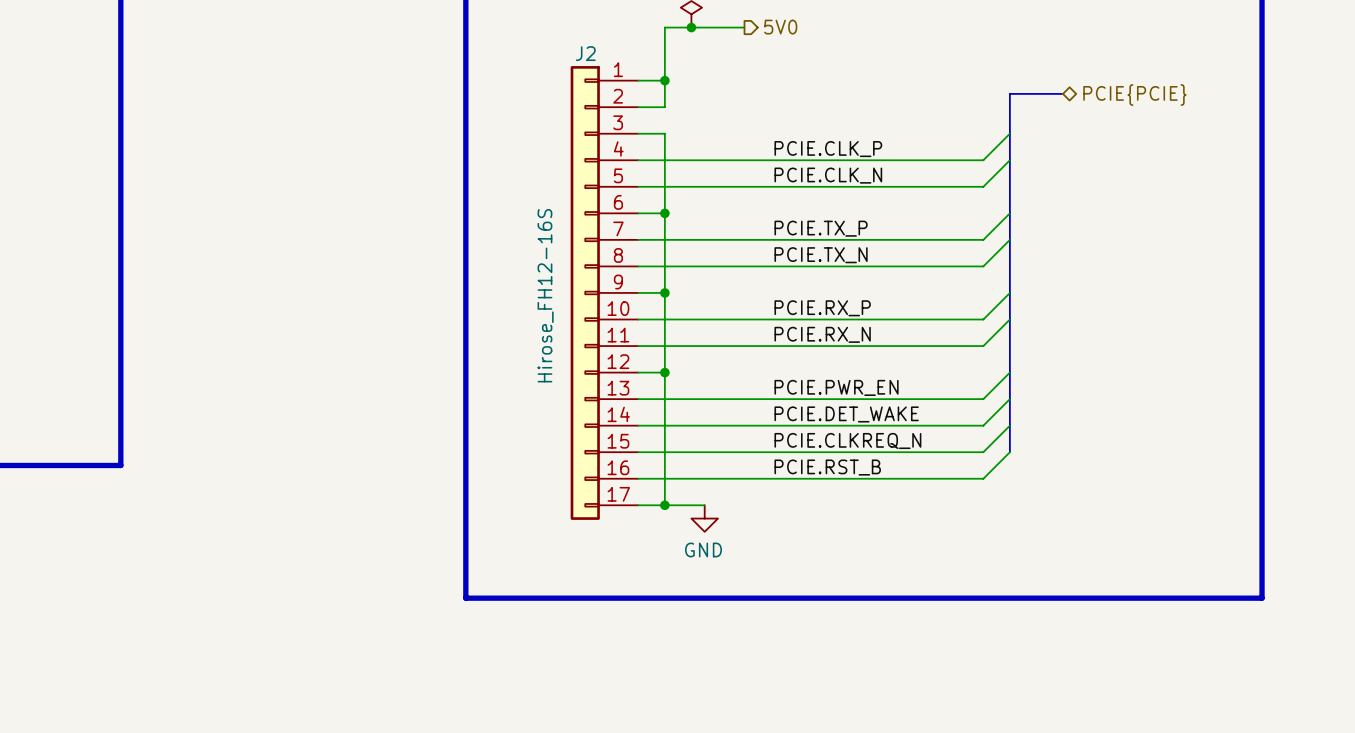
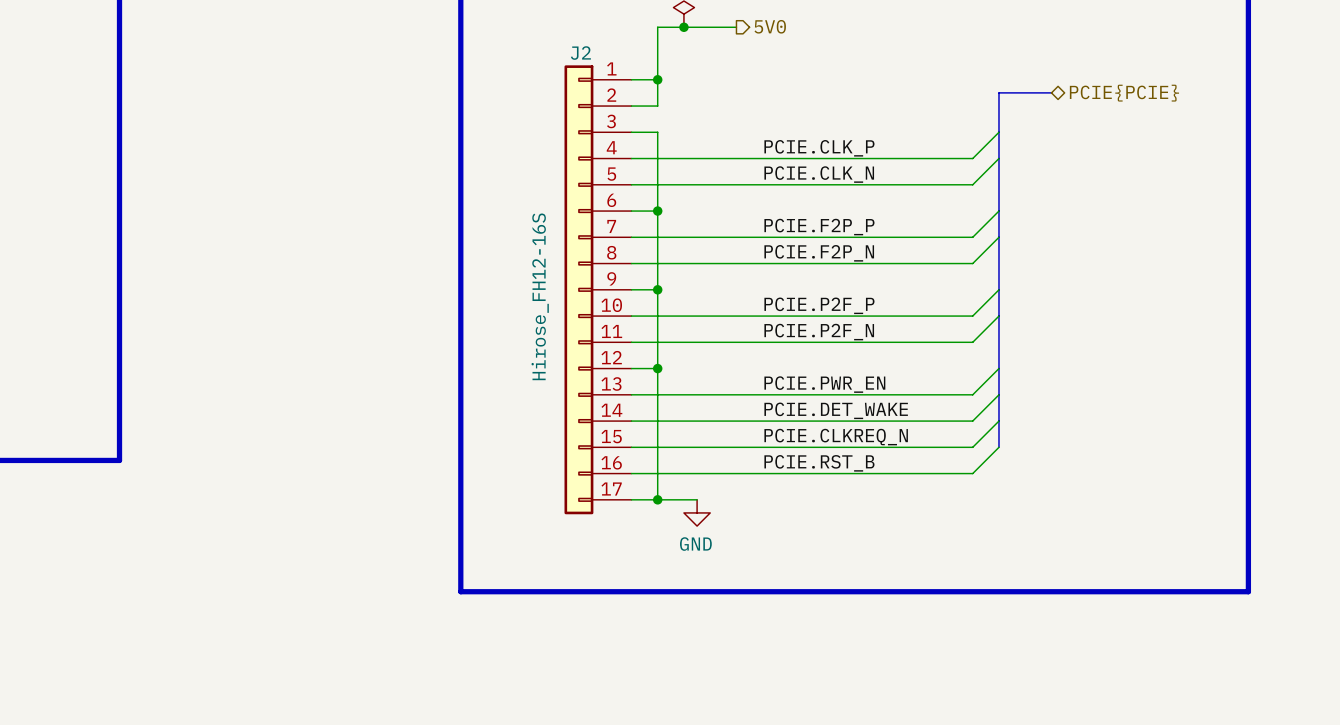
label: PCIE.TX_P (821, 228) -> PCIE.F2P_P (819, 227)
label: PCIE.TX_N (821, 255) -> PCIE.F2P_N (819, 253)
label: PCIE.RX_P (822, 308) -> PCIE.P2F_P (819, 305)
label: PCIE.RX_N (822, 334) -> PCIE.P2F_N (819, 332)

